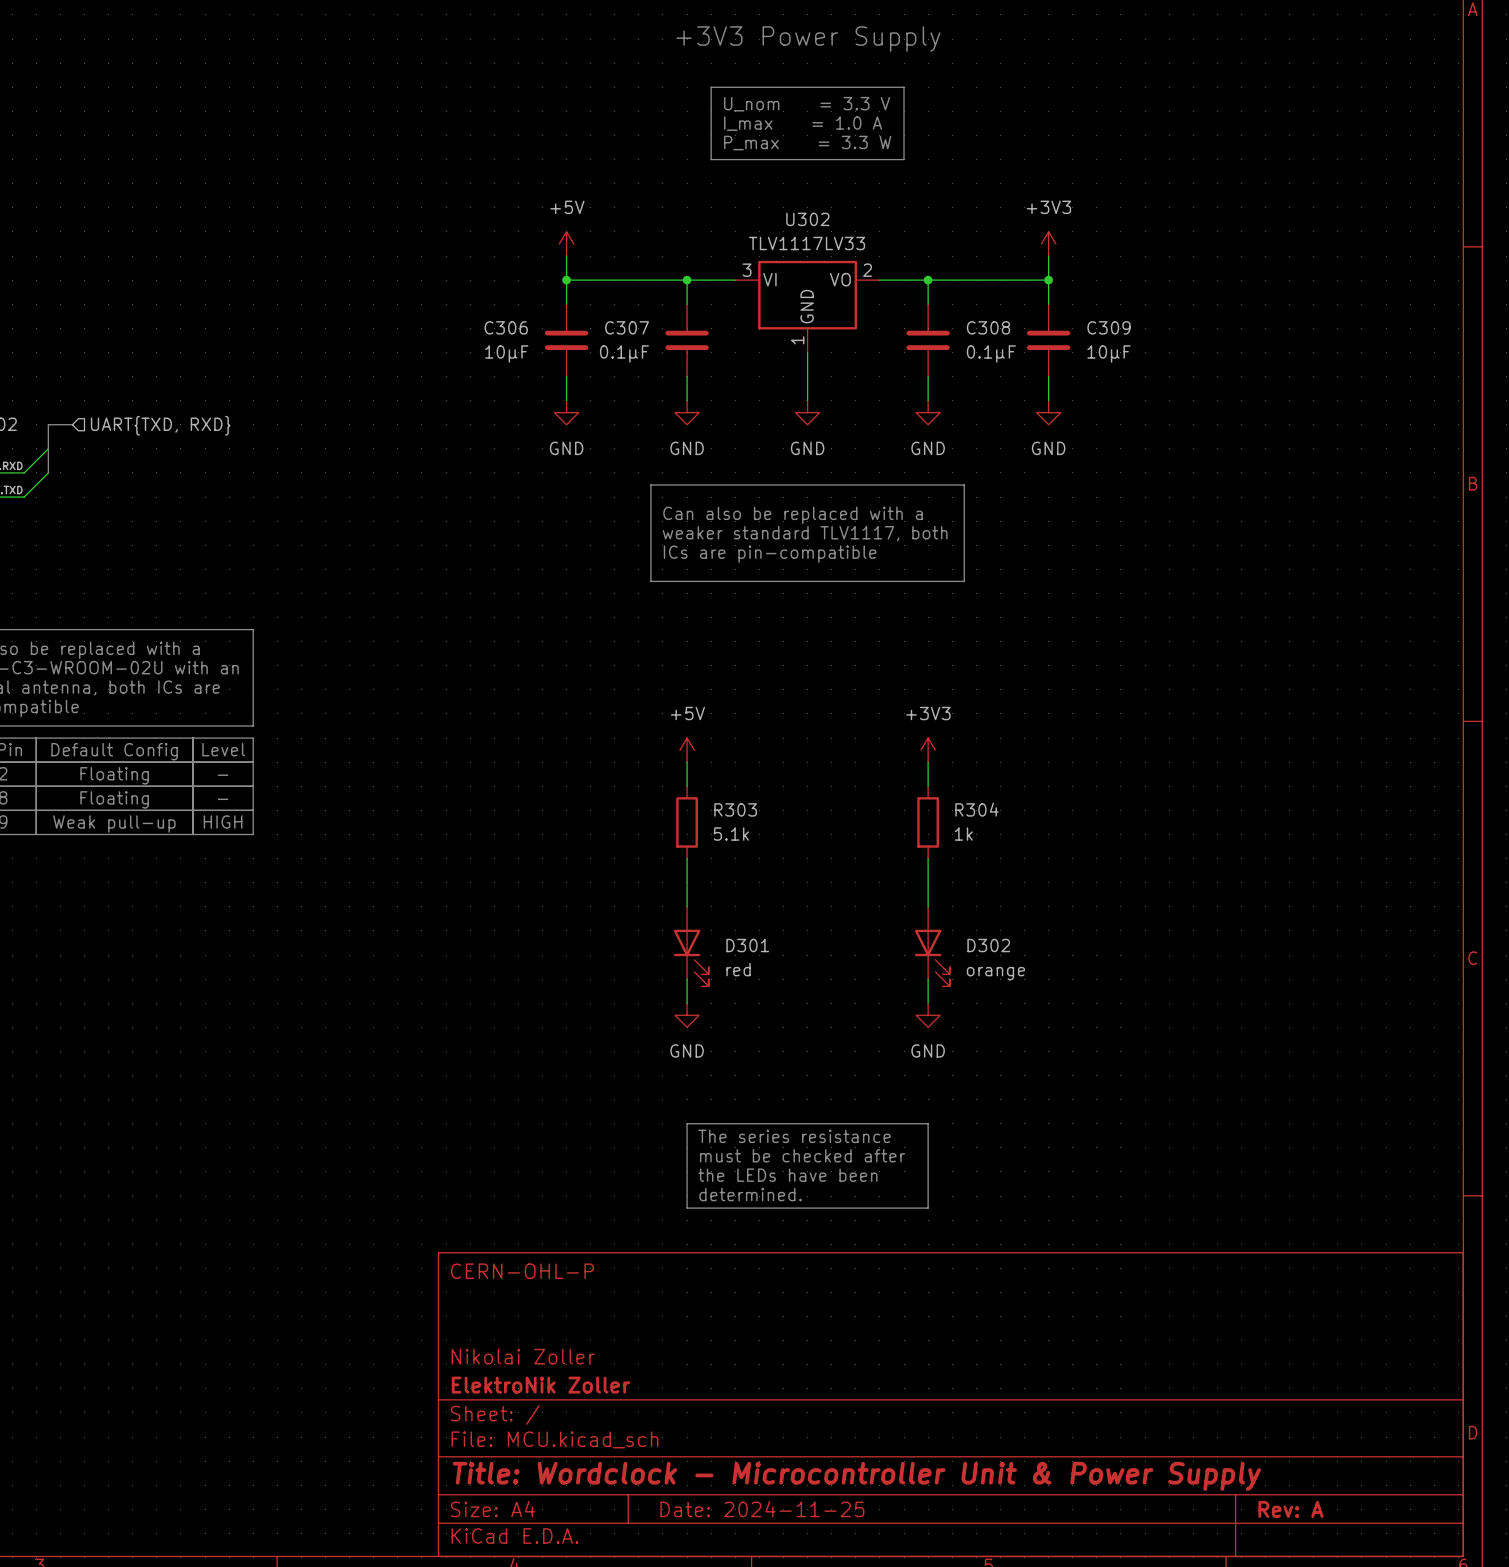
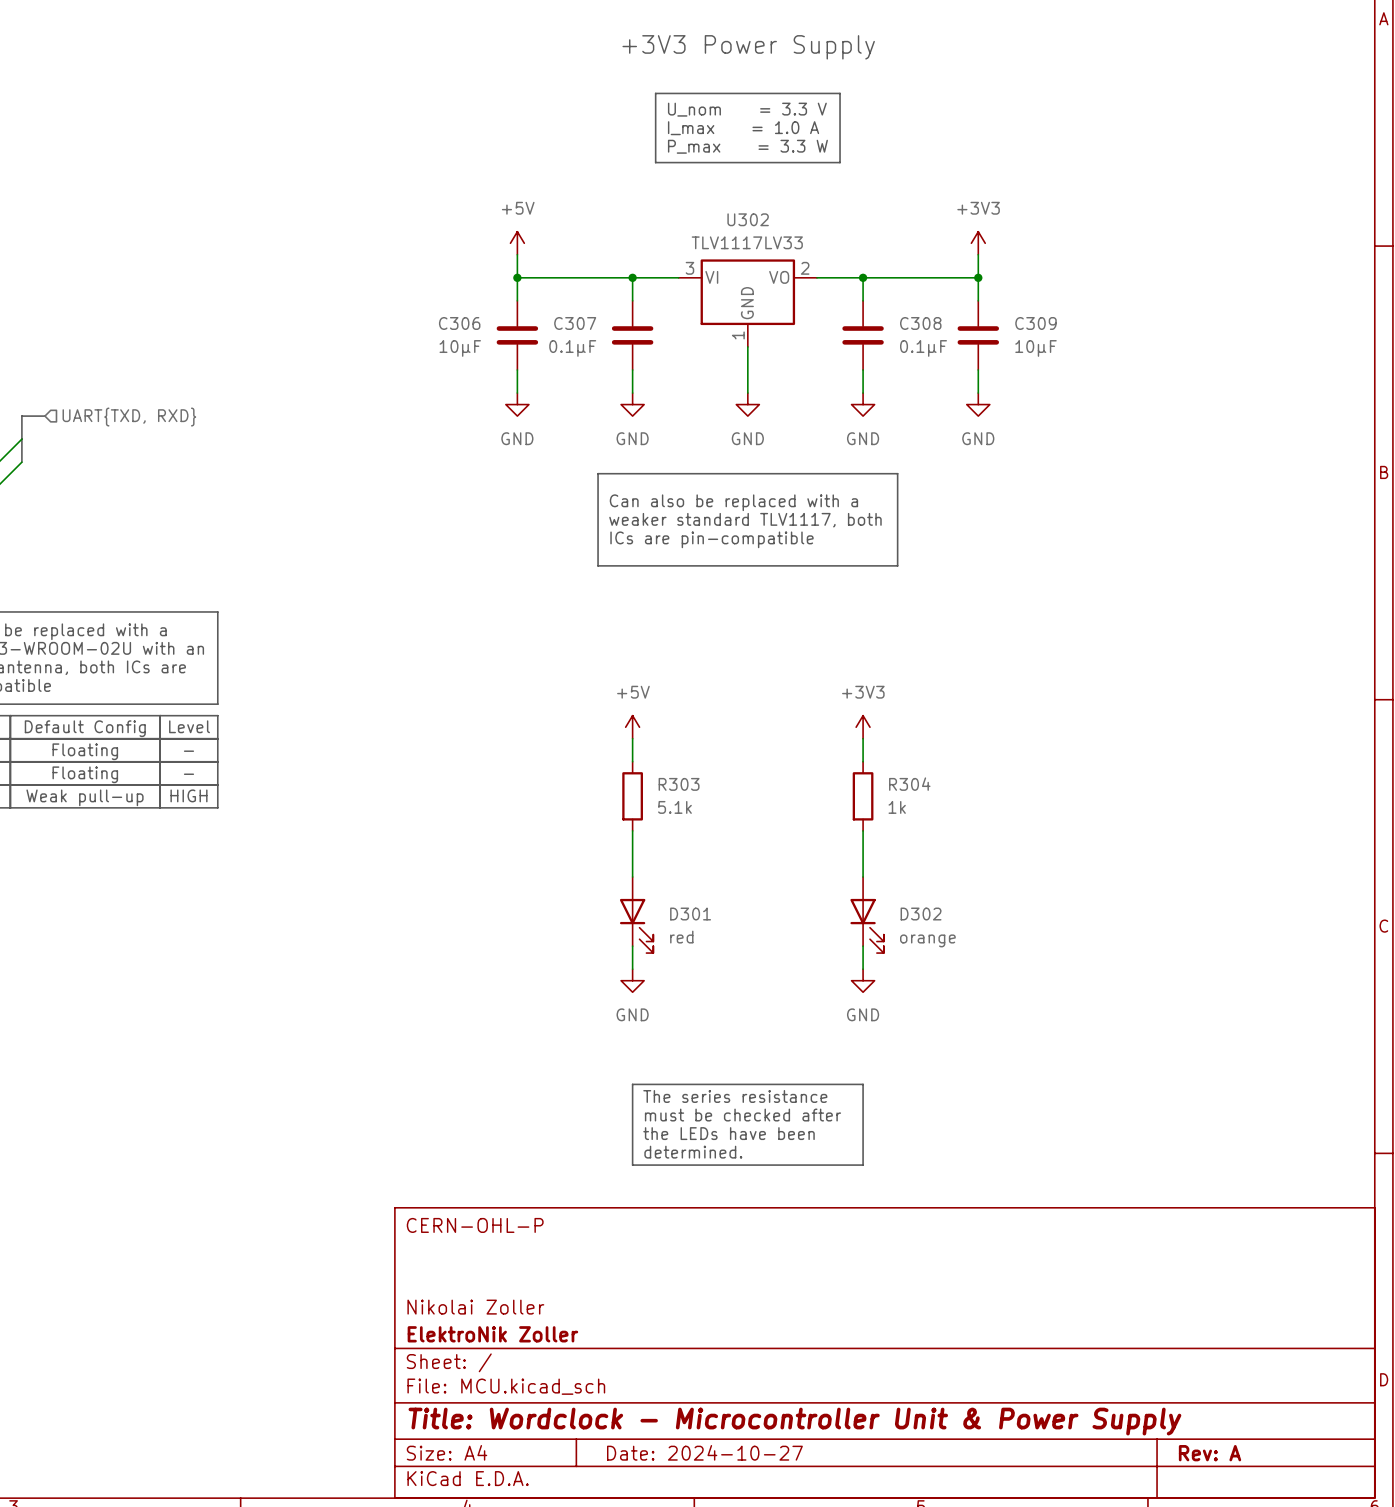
title block: Date: 2024-11-25 (762, 1509) -> Date: 2024-10-27 (704, 1452)

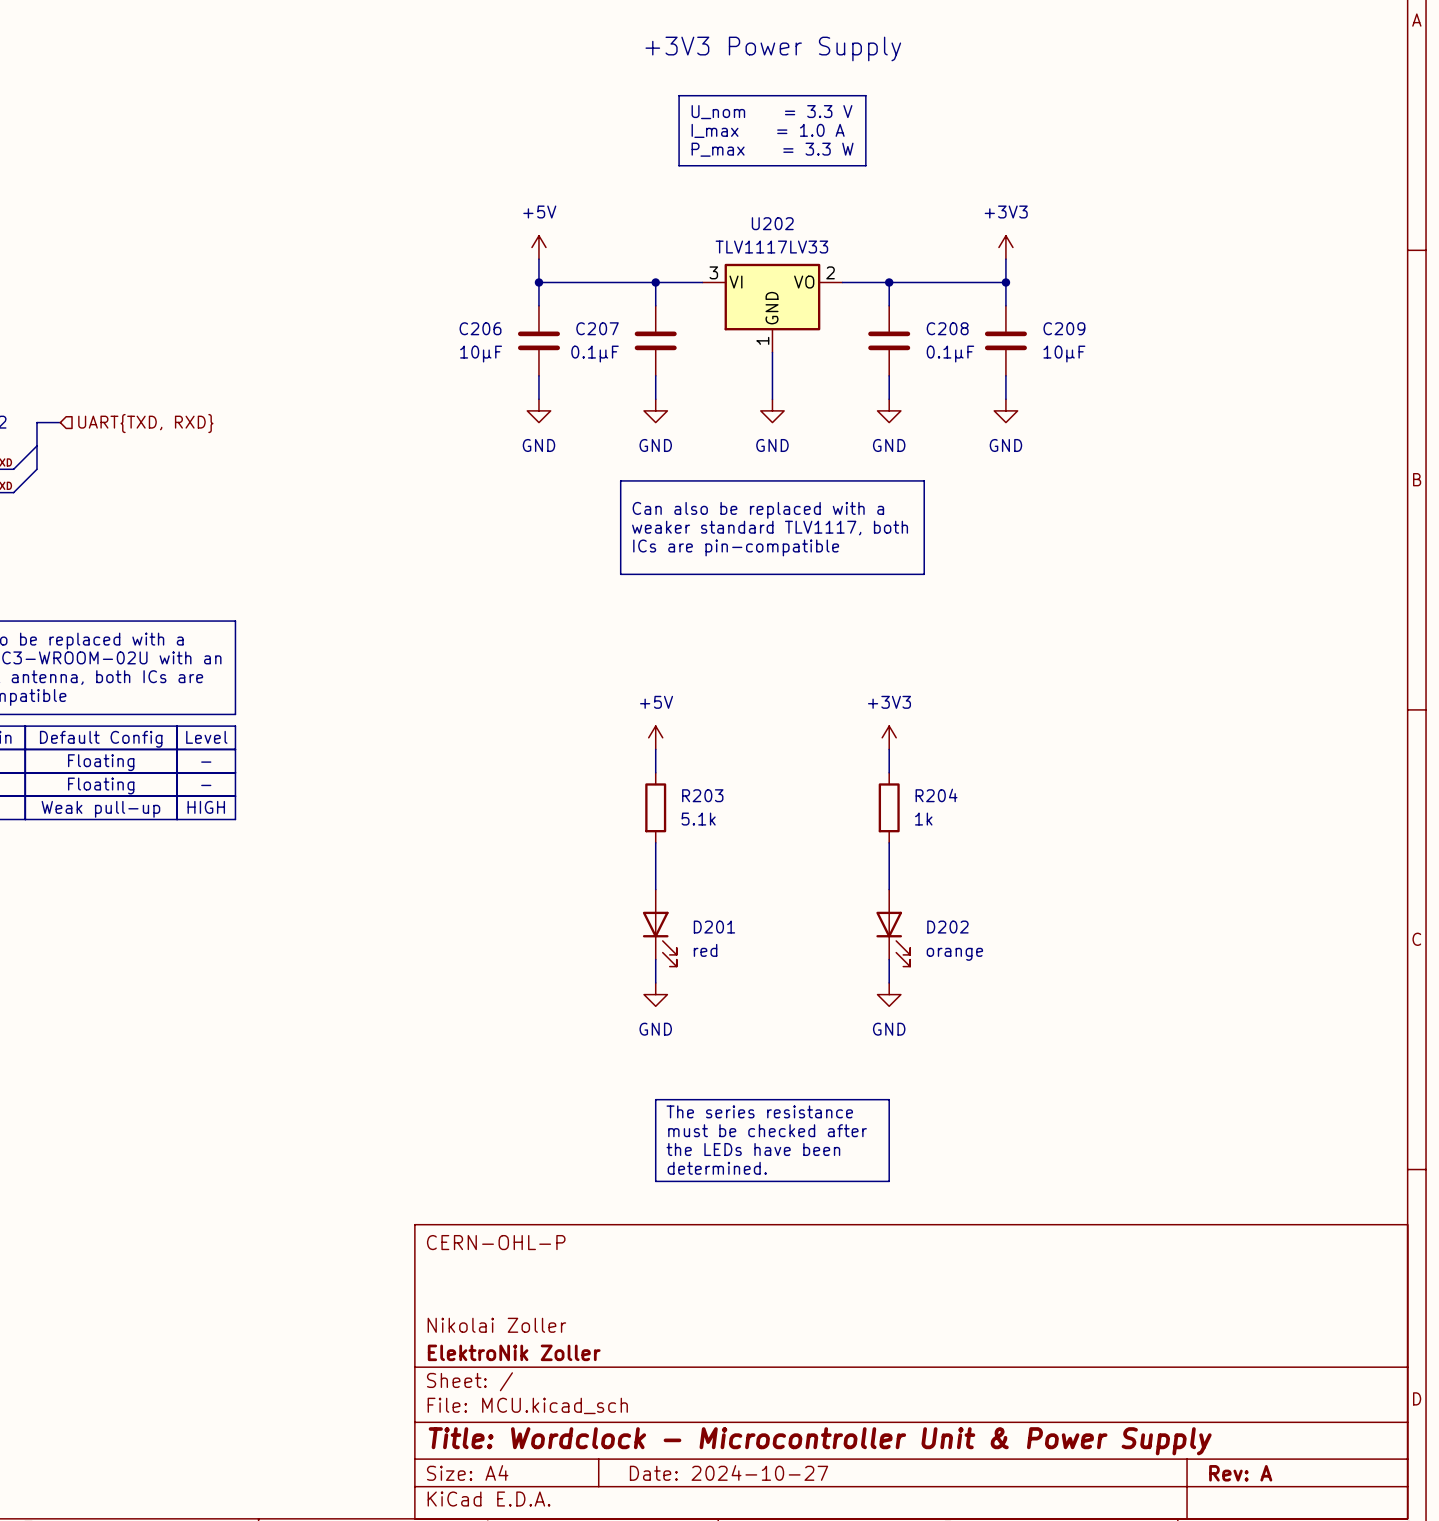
U302 name: U302 (748, 219) -> U202 (772, 223)
C306 name: C306 (459, 323) -> C206 (480, 328)
C307 name: C307 (575, 323) -> C207 (597, 328)
C308 name: C308 (920, 323) -> C208 (947, 328)
C309 name: C309 (1035, 323) -> C209 (1064, 328)
R303 name: R303 (679, 784) -> R203 (702, 795)
R304 name: R304 (909, 784) -> R204 (936, 795)
D301 name: D301 (690, 914) -> D201 (714, 927)
D302 name: D302 (921, 914) -> D202 (947, 927)

